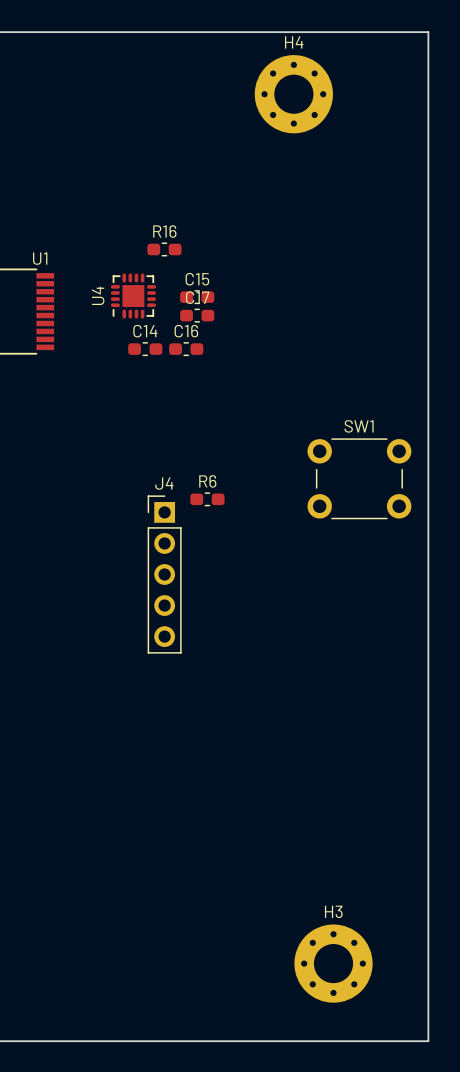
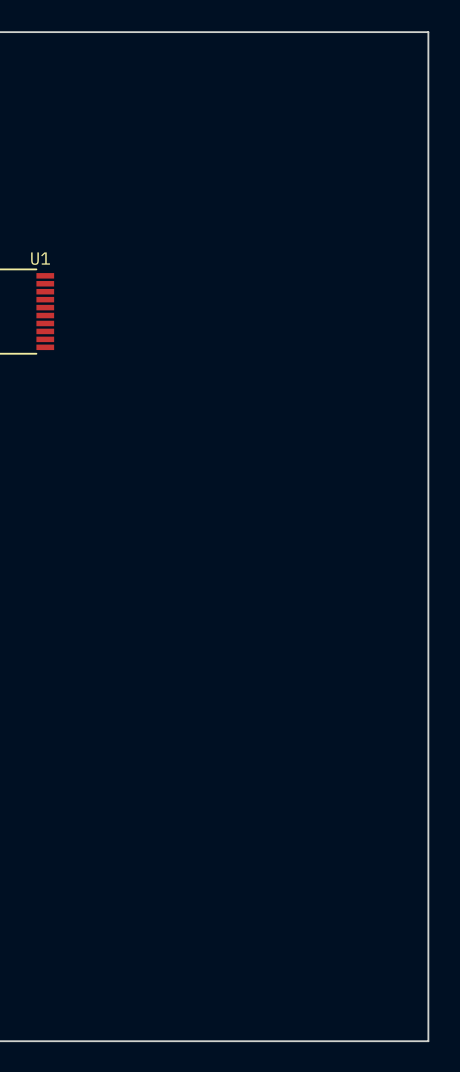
H4: (293, 94) -> none
R16: (164, 249) -> none
U4: (133, 296) -> none
C15: (197, 297) -> none
C17: (197, 315) -> none
C14: (145, 349) -> none
C16: (186, 349) -> none
SW1: (359, 478) -> none
R6: (207, 499) -> none
J4: (164, 574) -> none
H3: (333, 963) -> none

